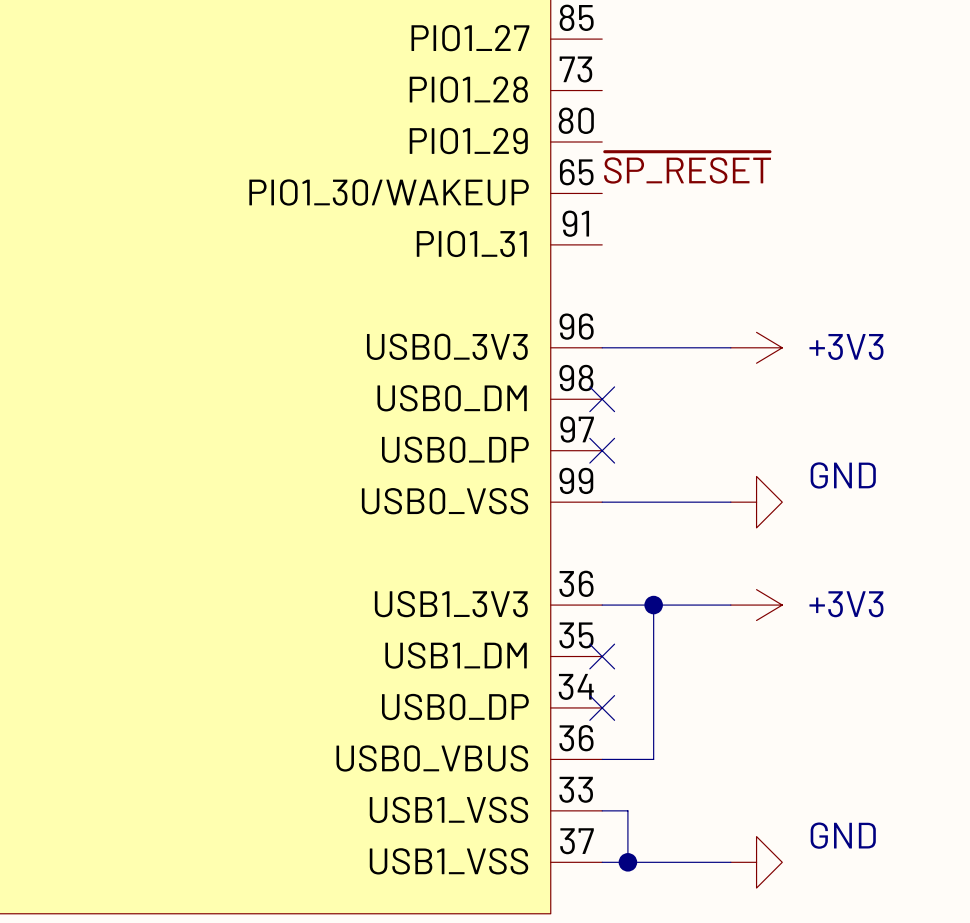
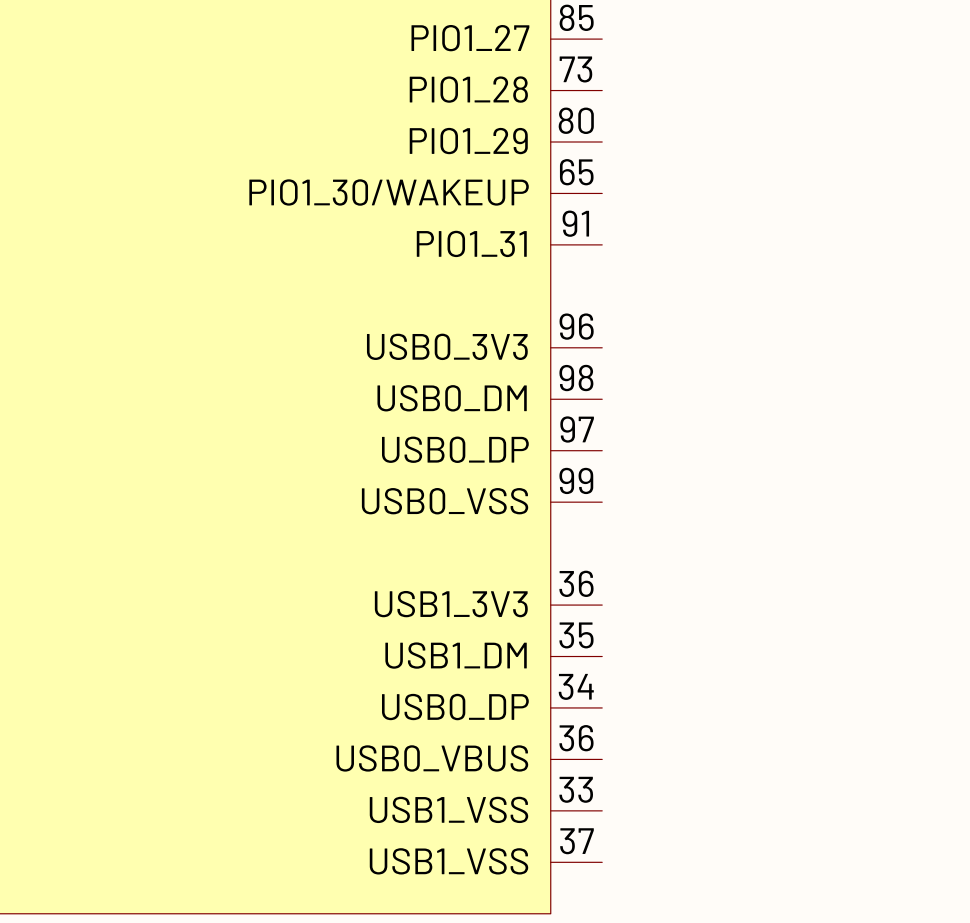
label: ~{SP_RESET} (687, 167) -> none
wire: (602, 347) (730, 347) -> none
power symbol: +3V3 (756, 347) -> none
no-connect mark: (602, 399) -> none
no-connect mark: (602, 450) -> none
wire: (602, 502) (730, 502) -> none
power symbol: GND (756, 502) -> none
wire: (602, 605) (730, 605) -> none
wire: (653, 605) (653, 759) (602, 759) -> none
junction: (653, 605) -> none
power symbol: +3V3 (756, 605) -> none
no-connect mark: (602, 656) -> none
no-connect mark: (602, 707) -> none
wire: (602, 810) (627, 810) (627, 862) -> none
wire: (602, 862) (730, 862) -> none
junction: (627, 862) -> none
power symbol: GND (756, 862) -> none

